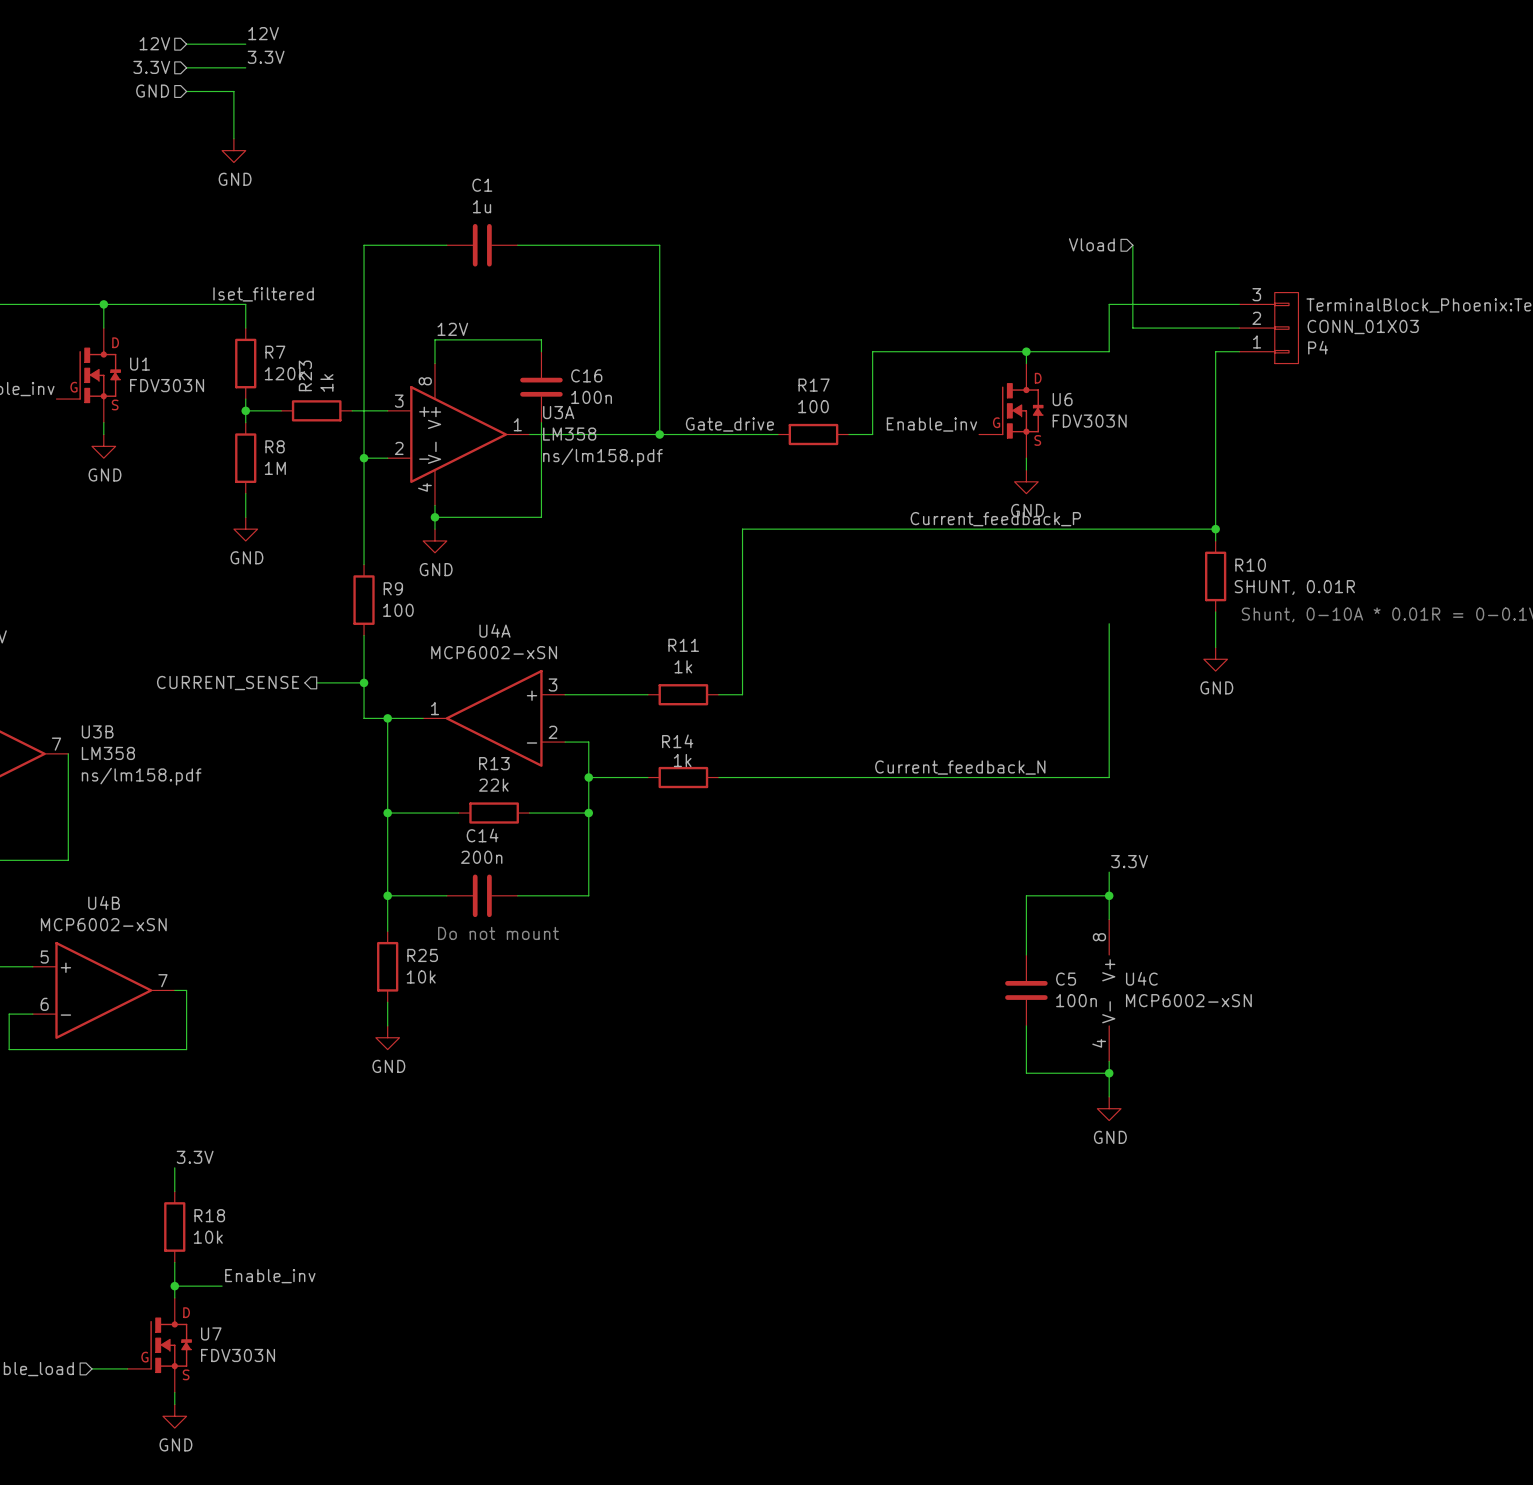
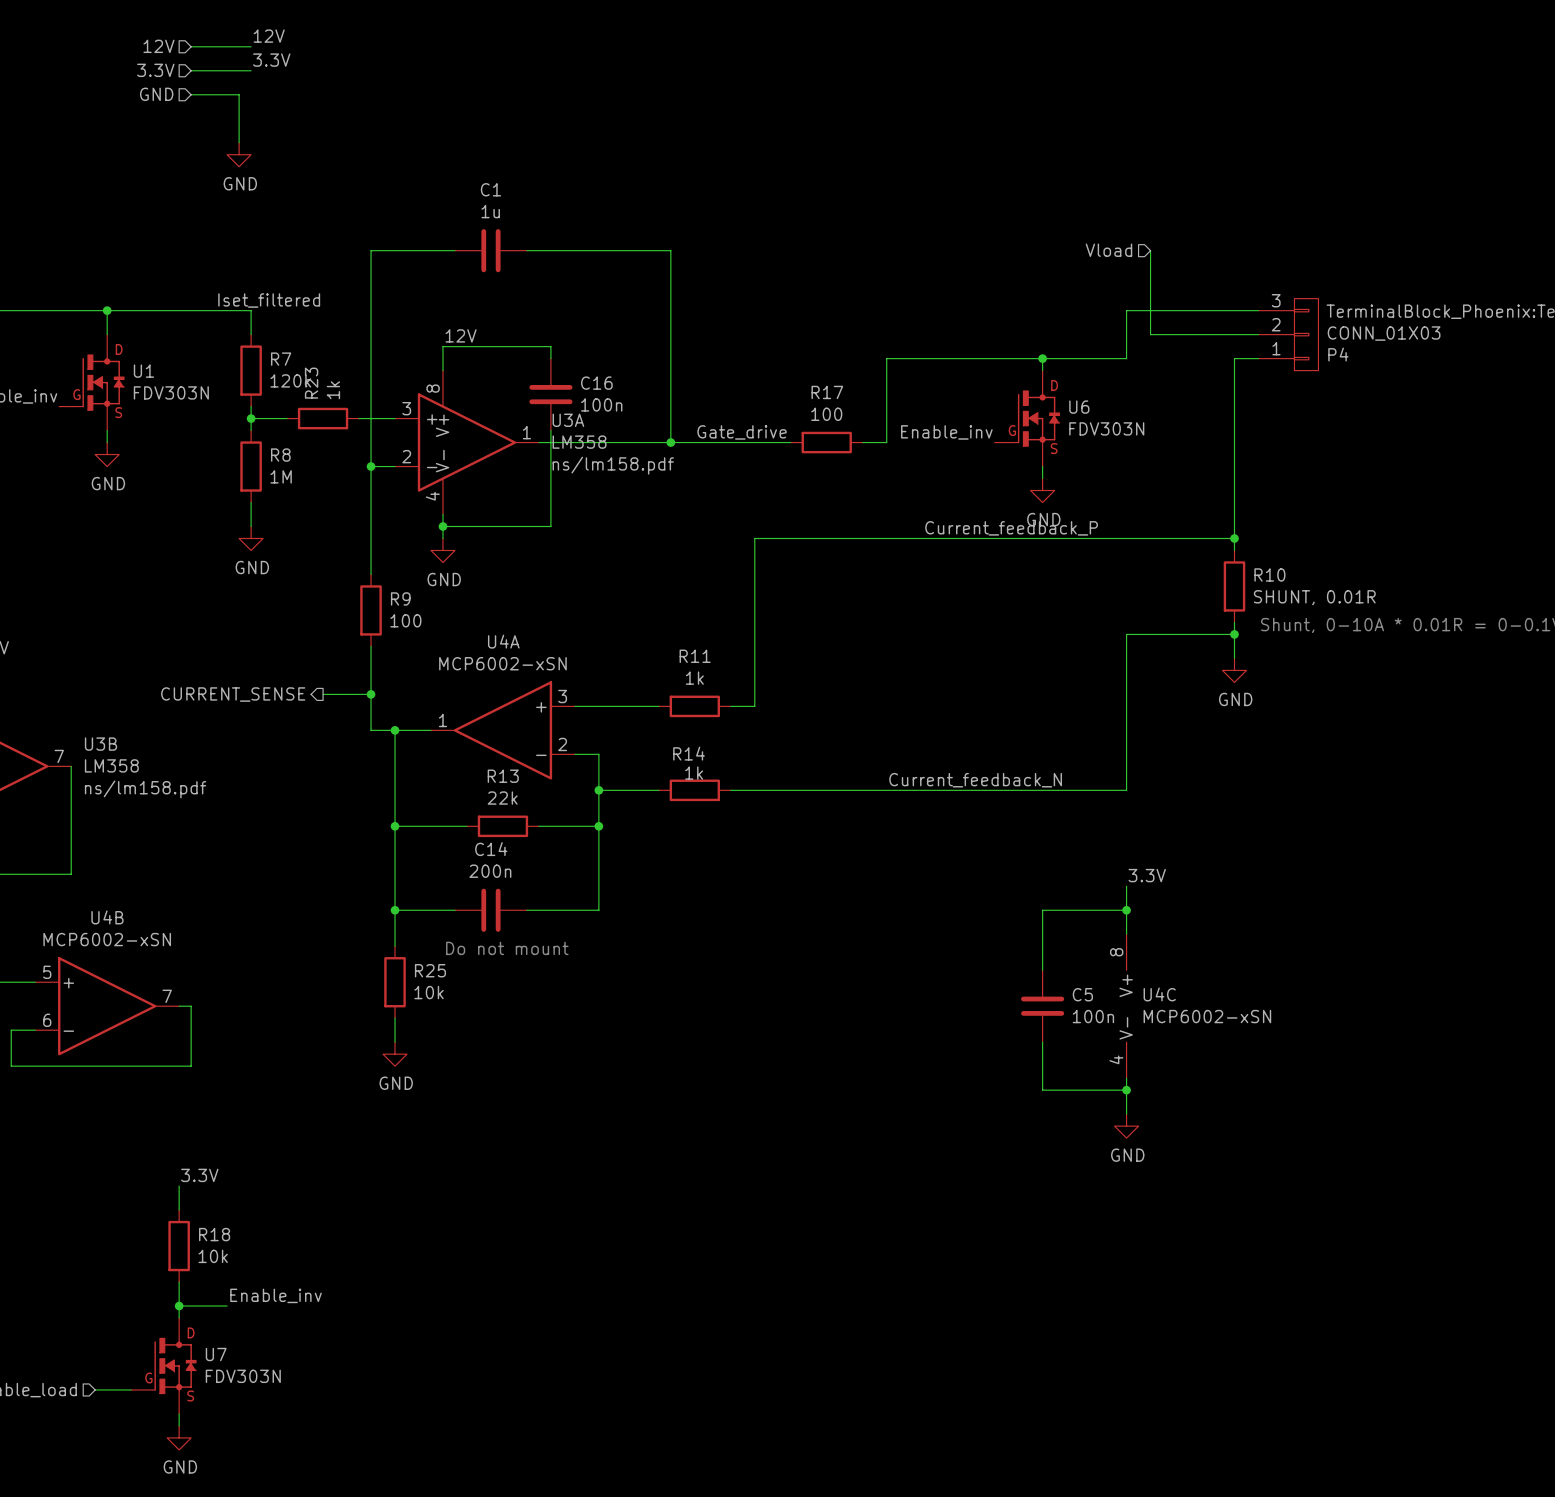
wire: none -> (1126, 634) (1234, 634)
junction: none -> (1234, 634)

